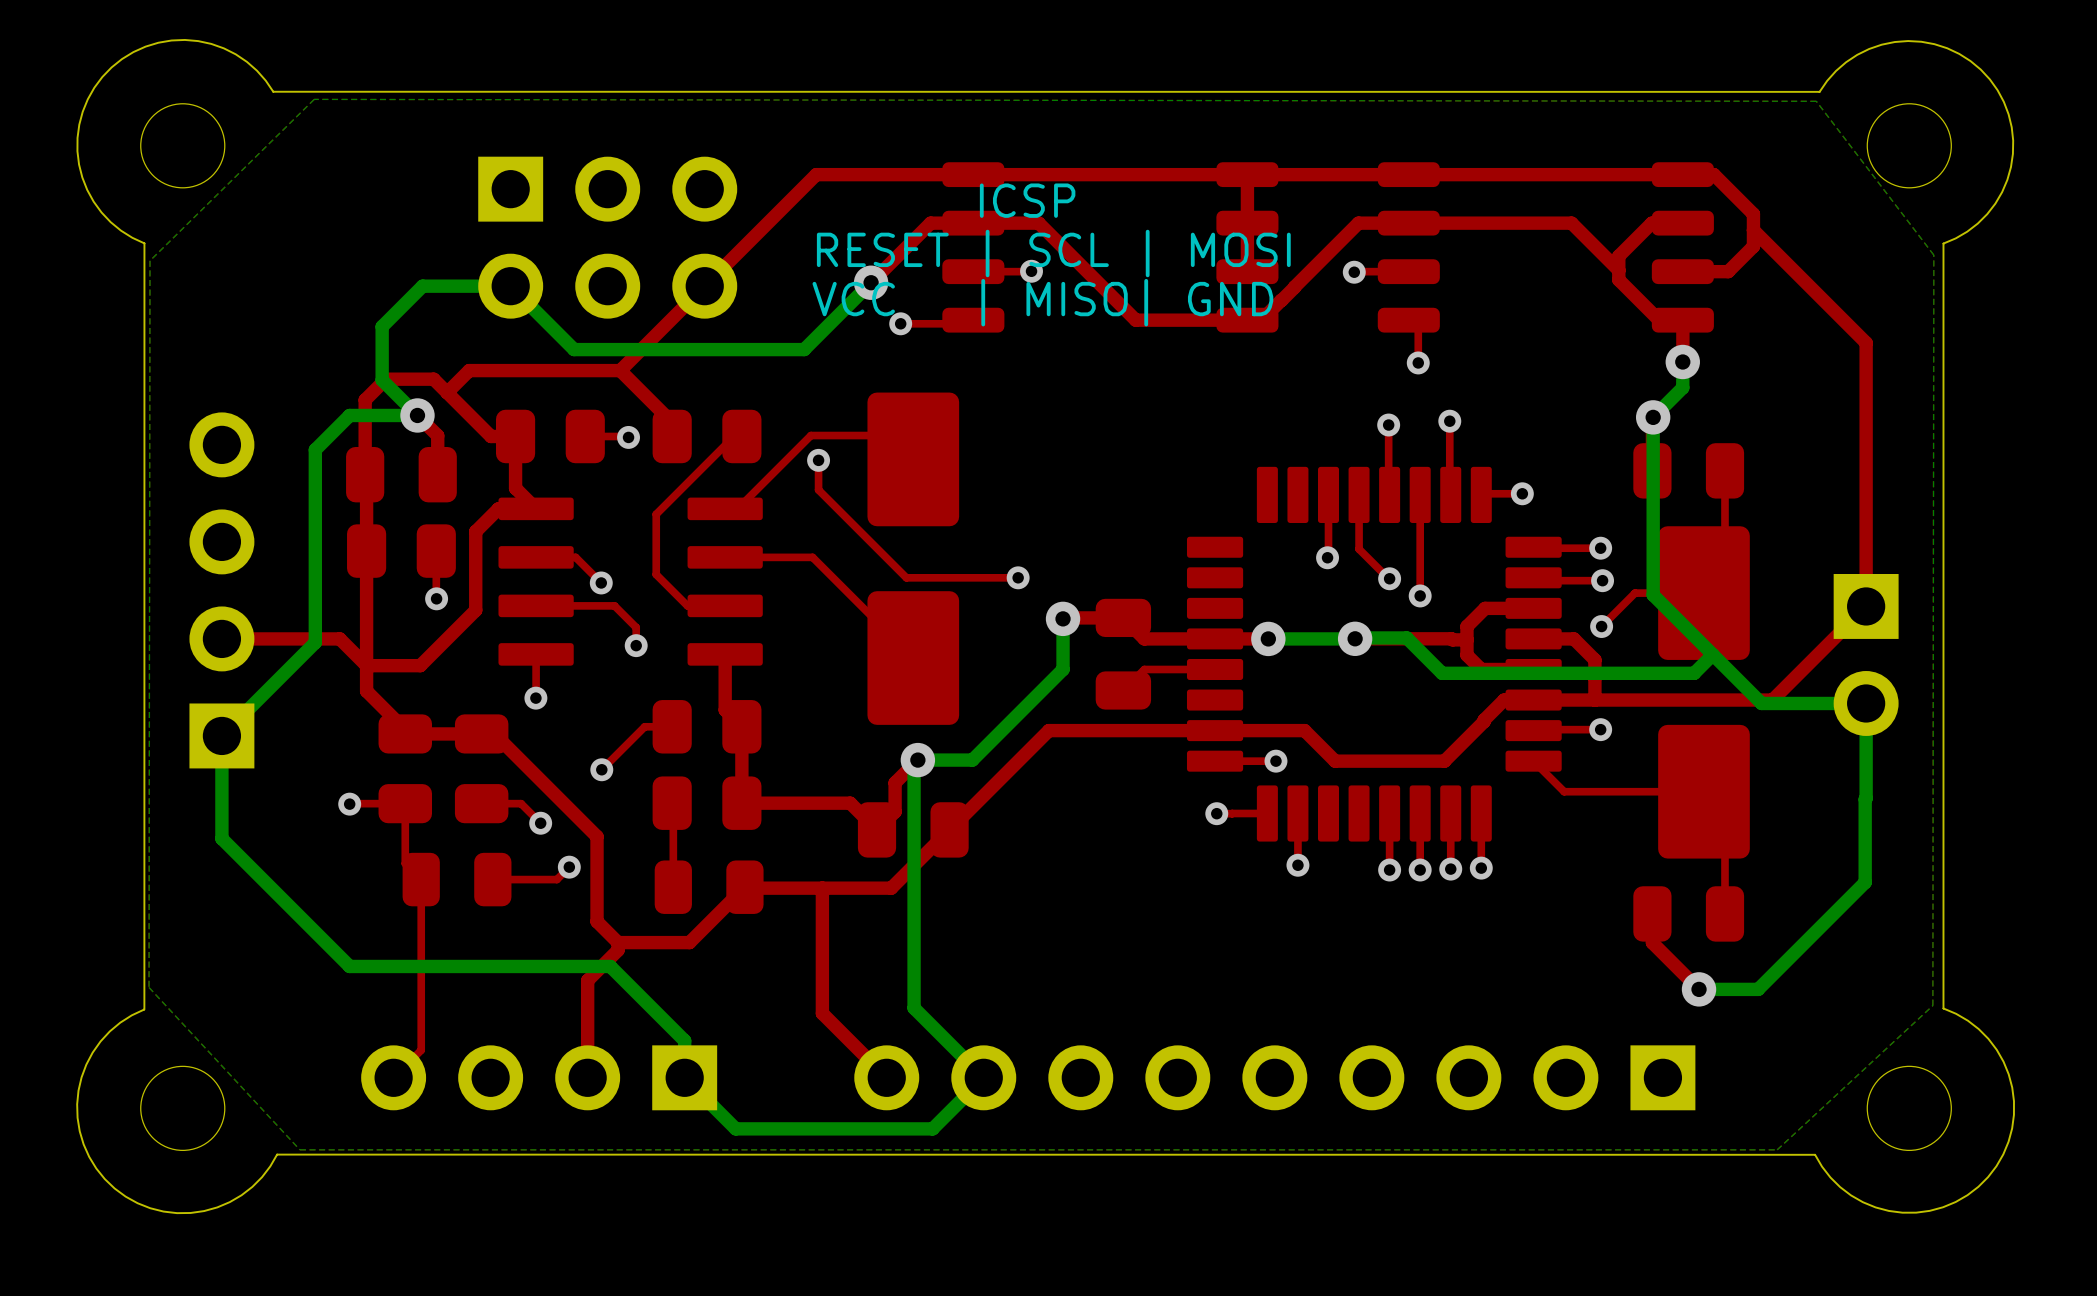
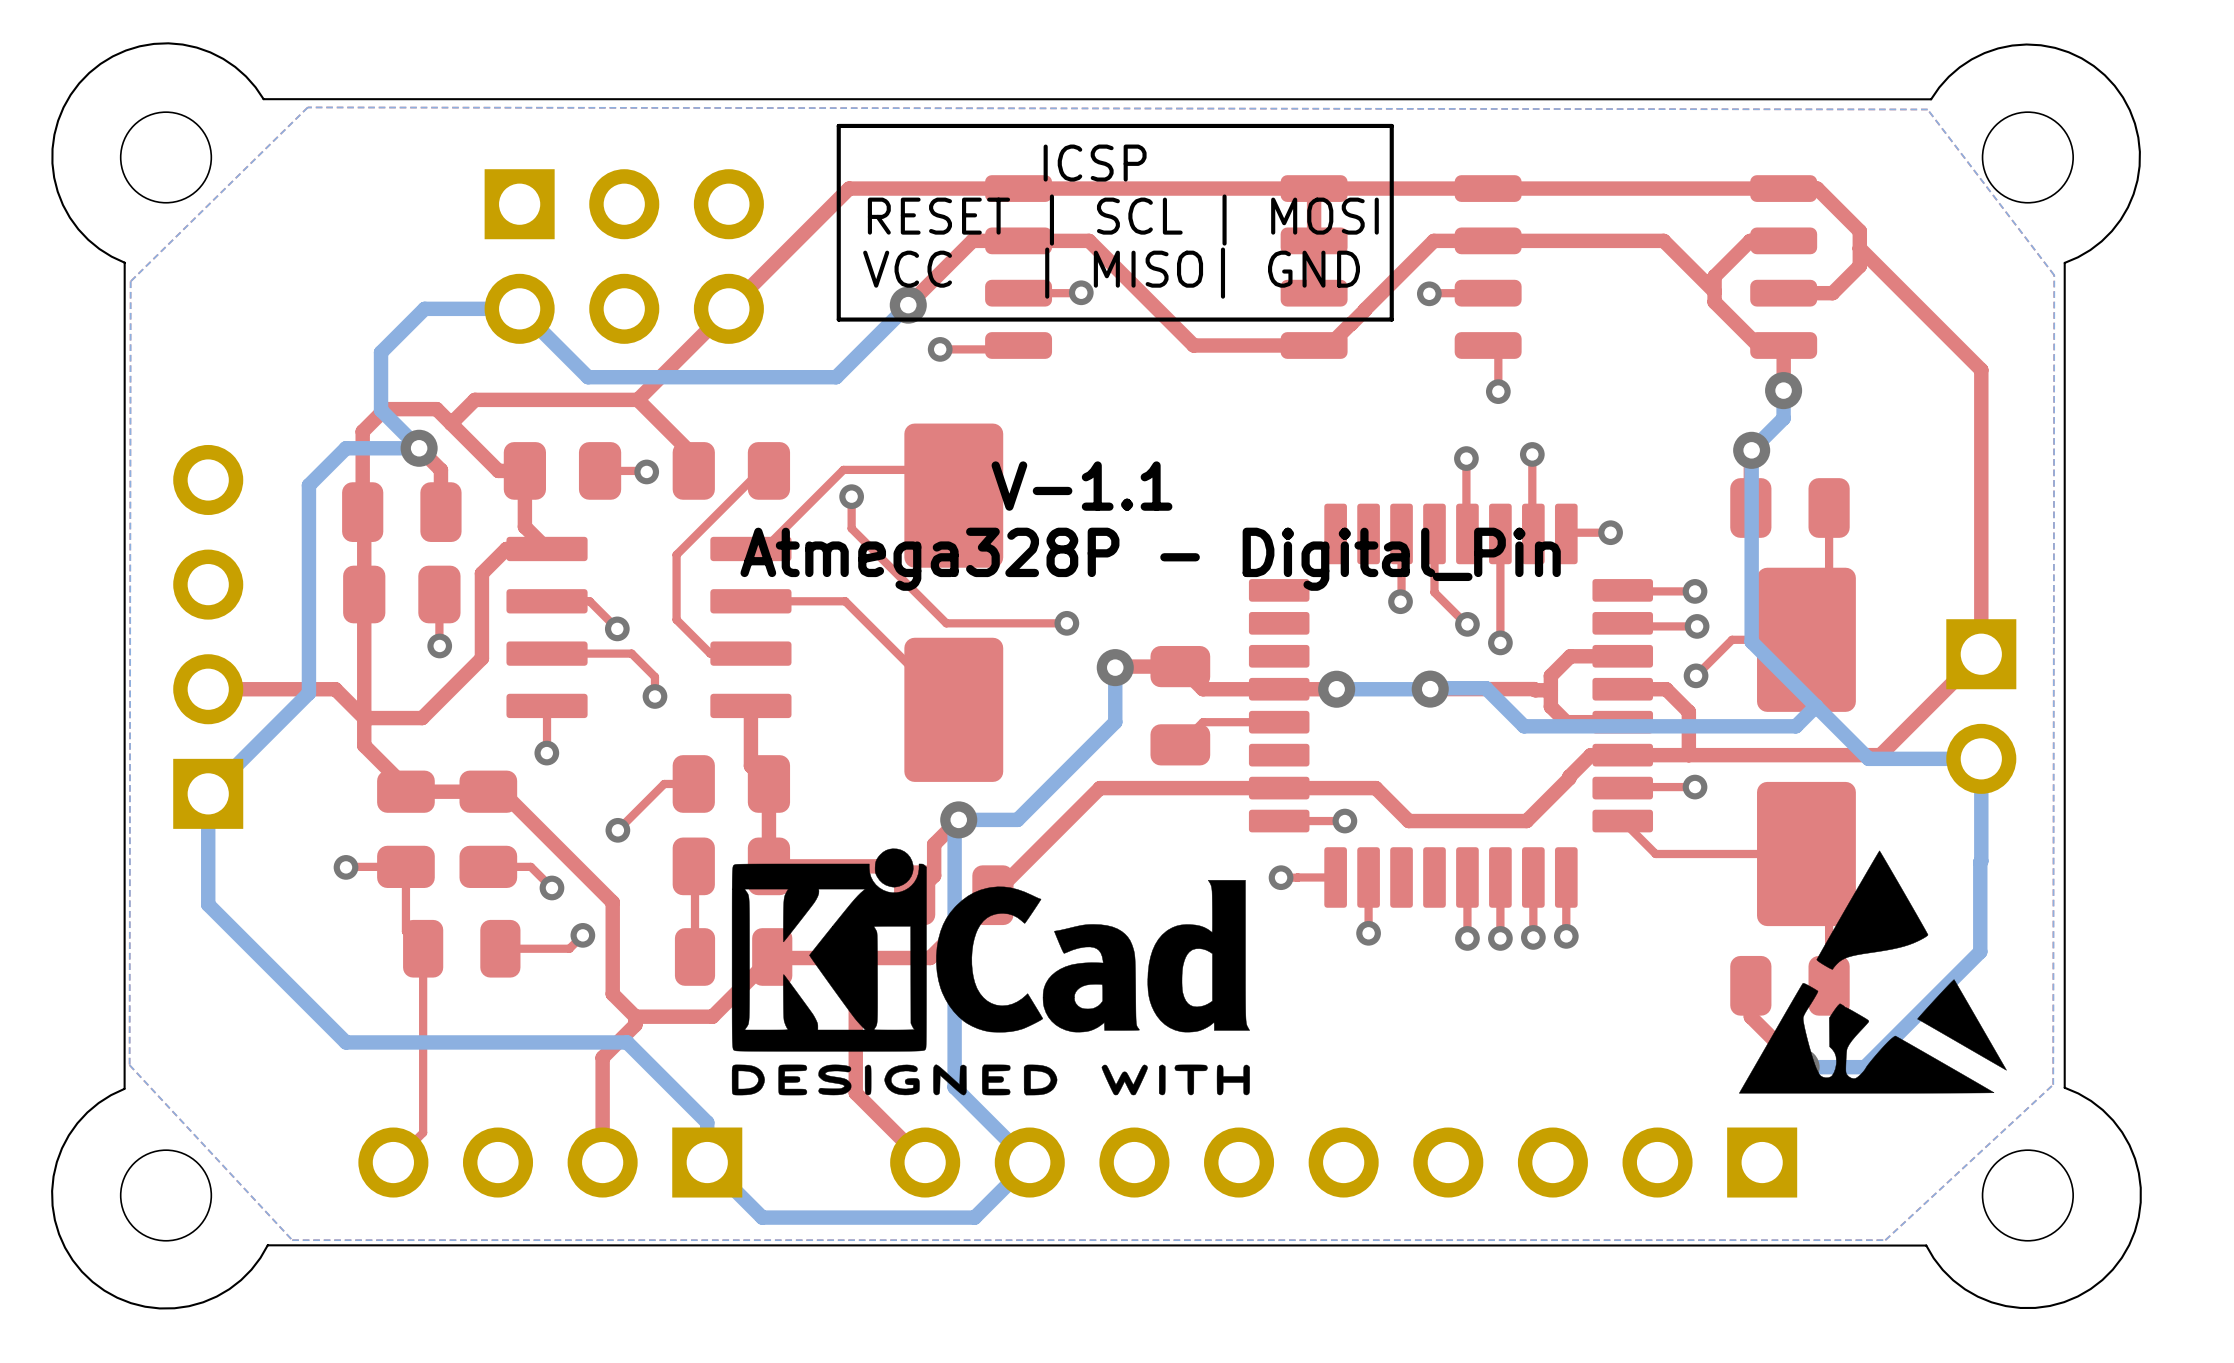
line: none -> (1391, 125) (838, 125) (838, 319) (1391, 319) (1391, 125)
text: none -> ICSP (1095, 163)
text: ICSP (1027, 200) -> RESET | SCL | MOSI (1123, 220)
text: RESET | SCL | MOSI (1053, 253) -> VCC | MISO| GND (1111, 273)
text: VCC | MISO| GND (1042, 302) -> none
text: none -> V-1.1 (1081, 486)
text: none -> Atmega328P - Digital_Pin (1150, 559)
drawing: none -> [731, 848, 1250, 1096]
drawing: none -> [1739, 850, 2007, 1094]

